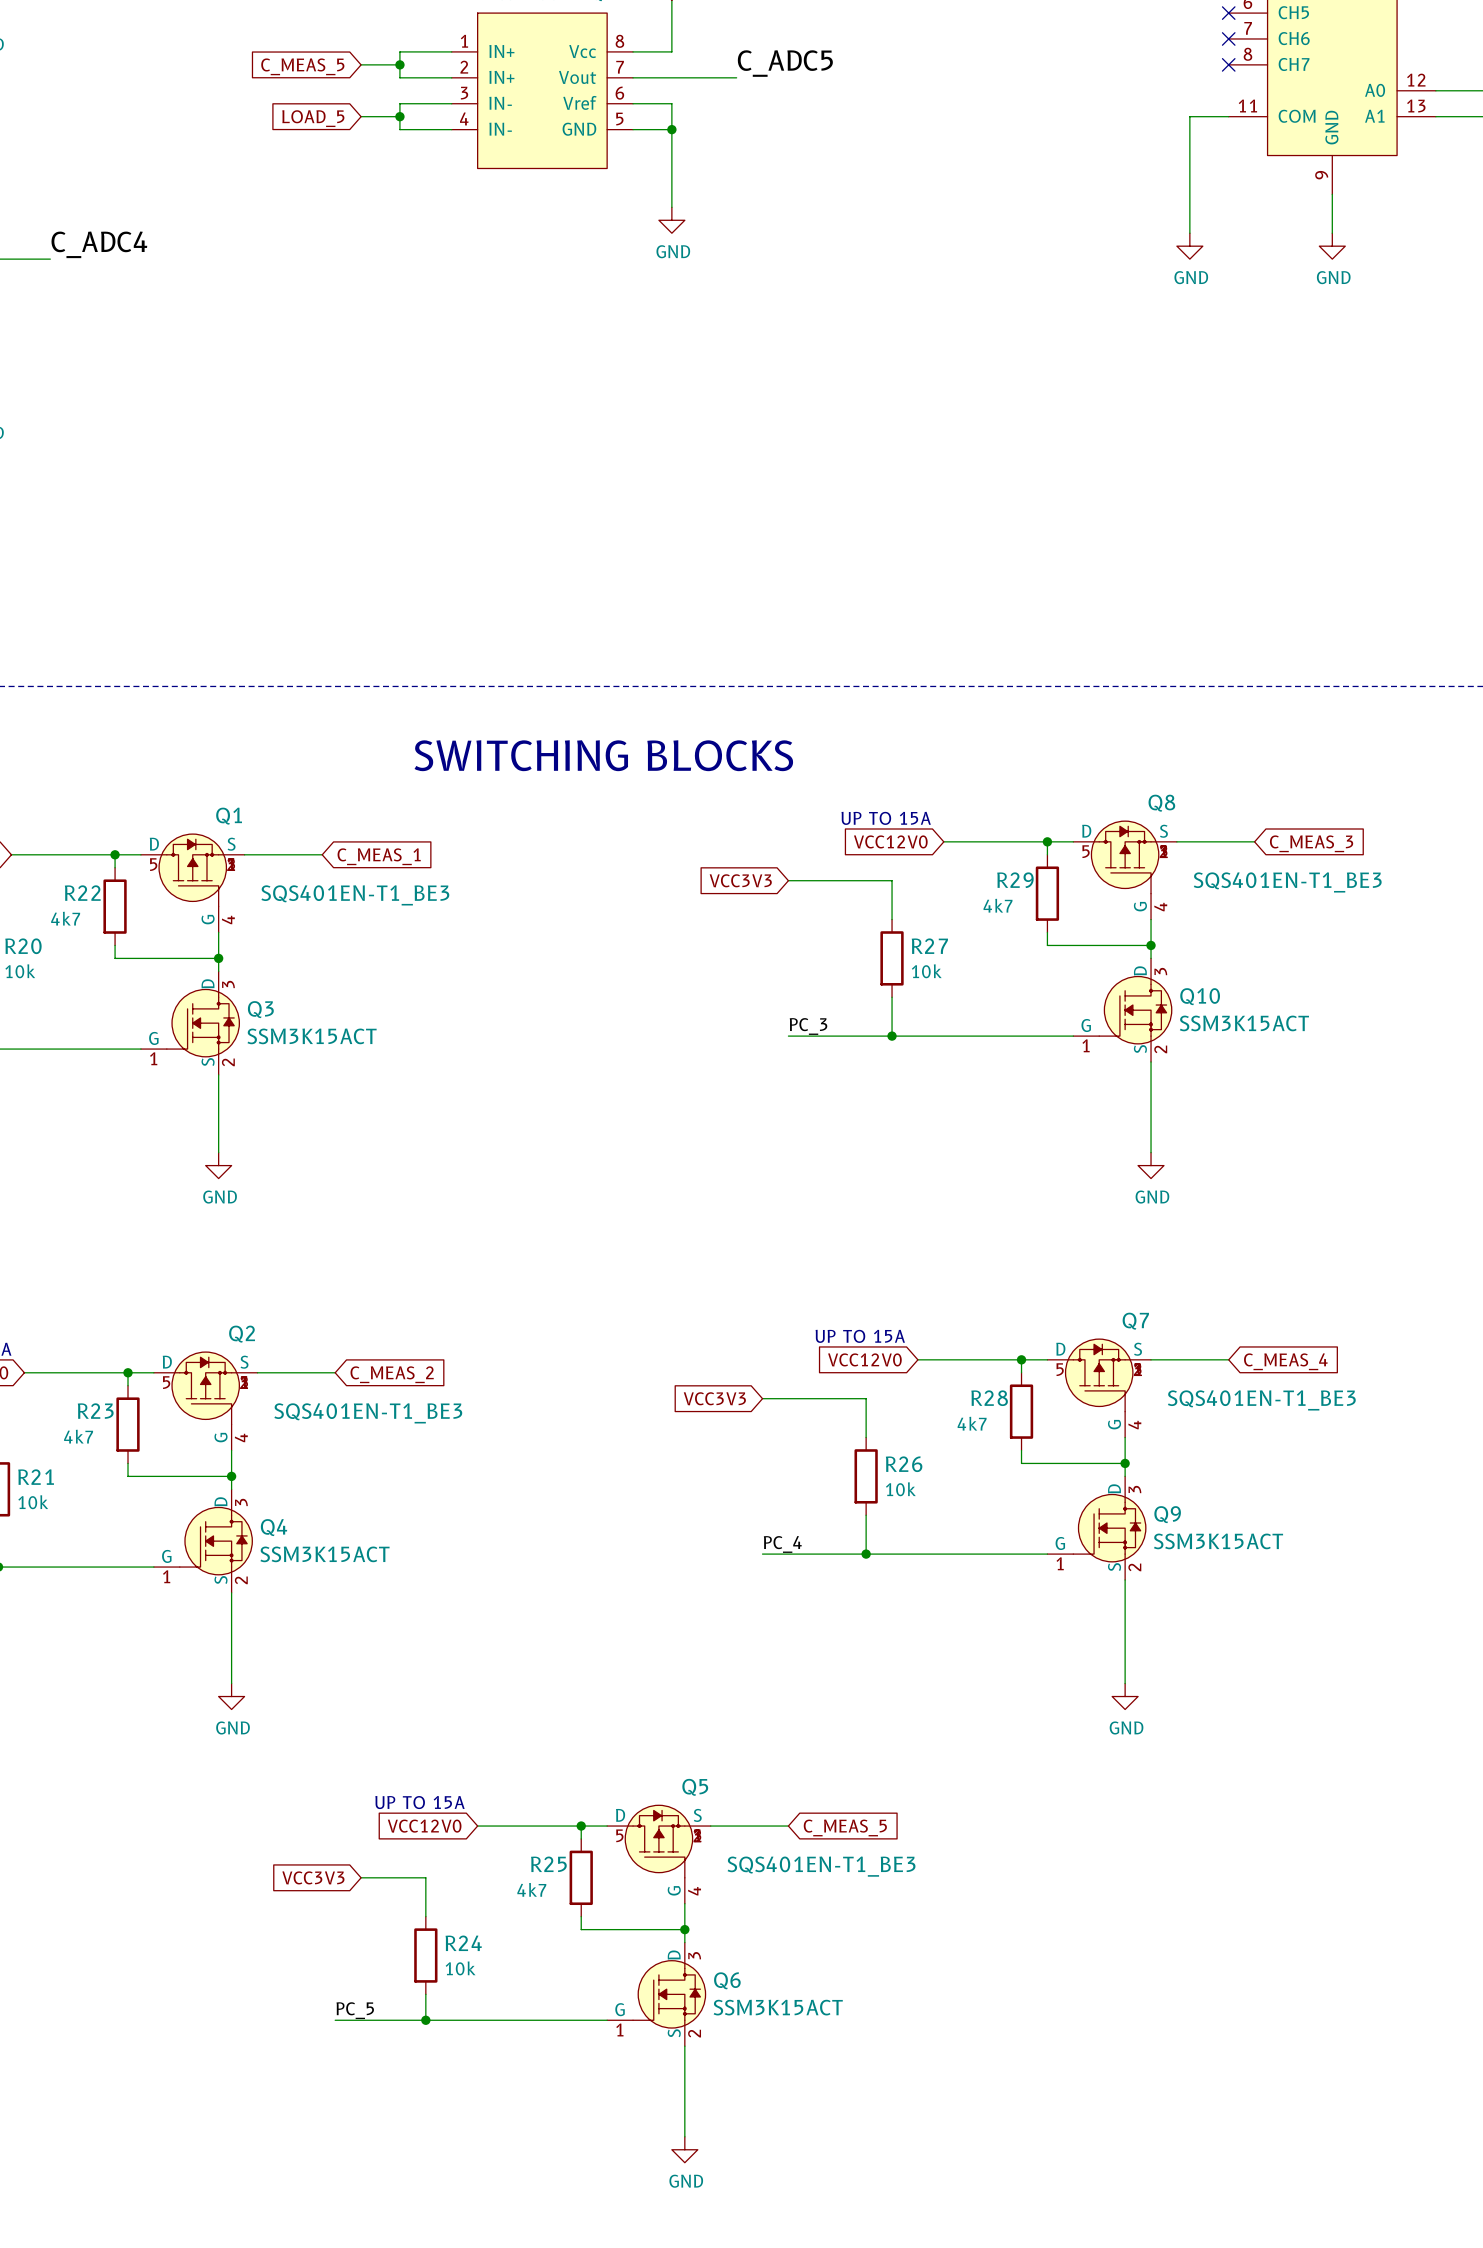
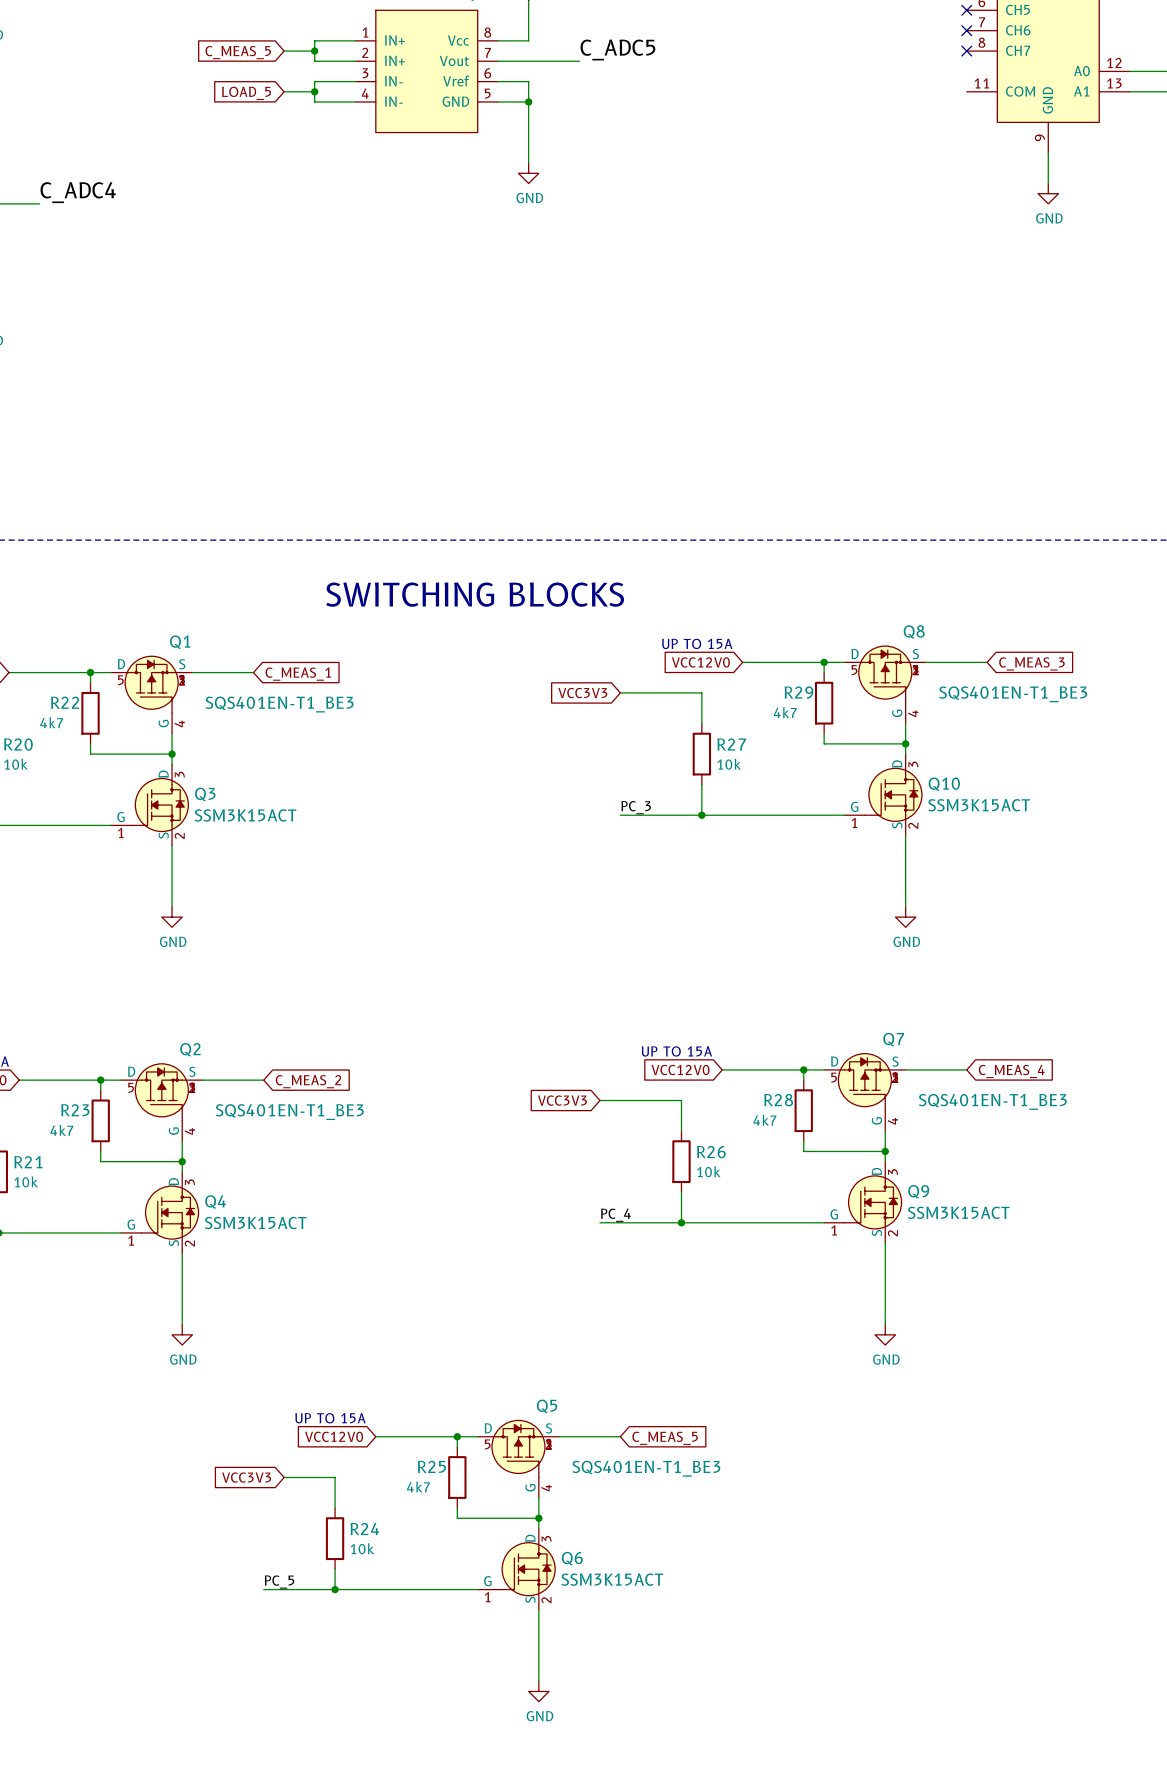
wire: (1228, 116) (1189, 116) (1189, 233) -> none
power symbol: GND (1189, 246) -> none

